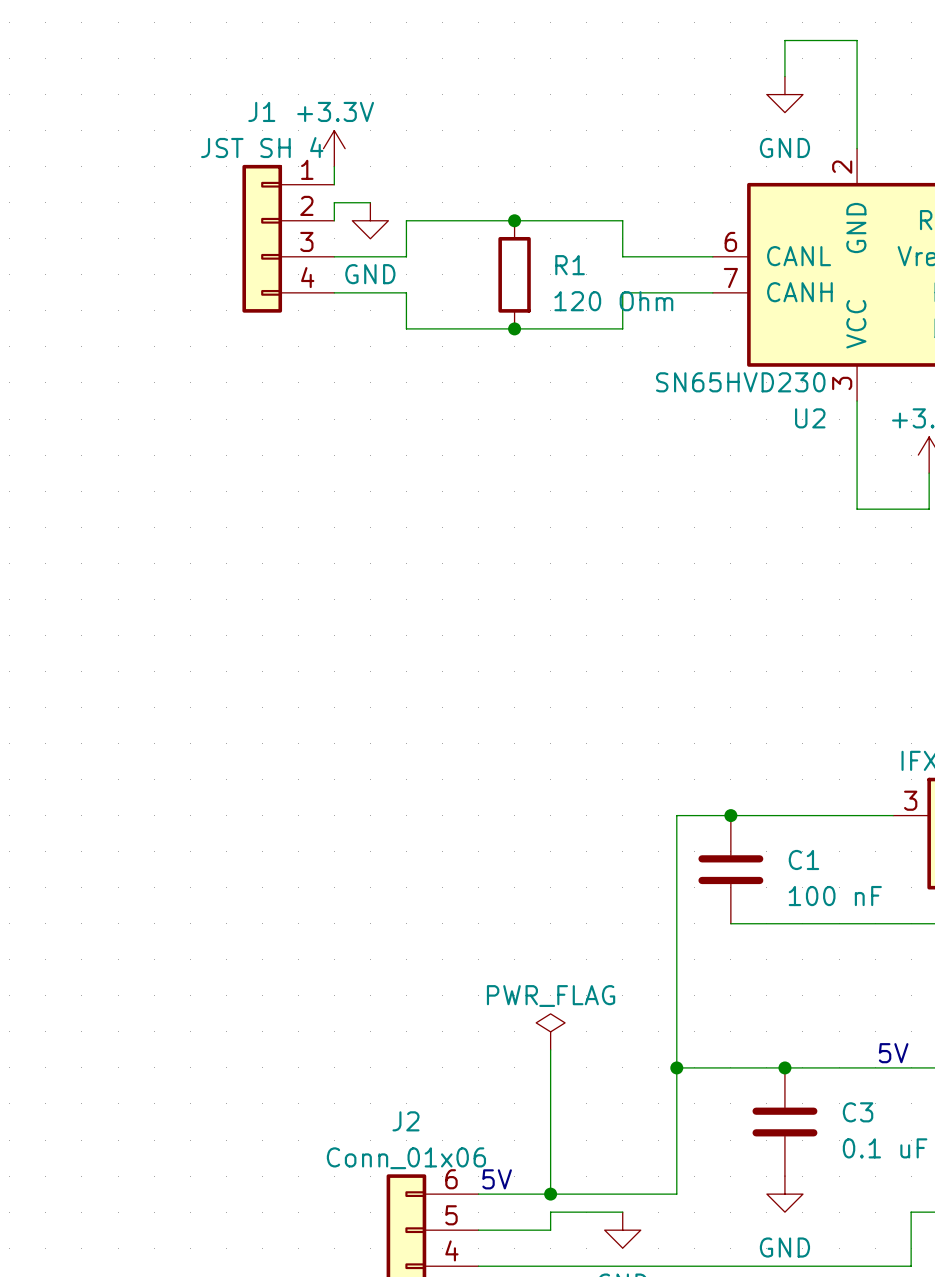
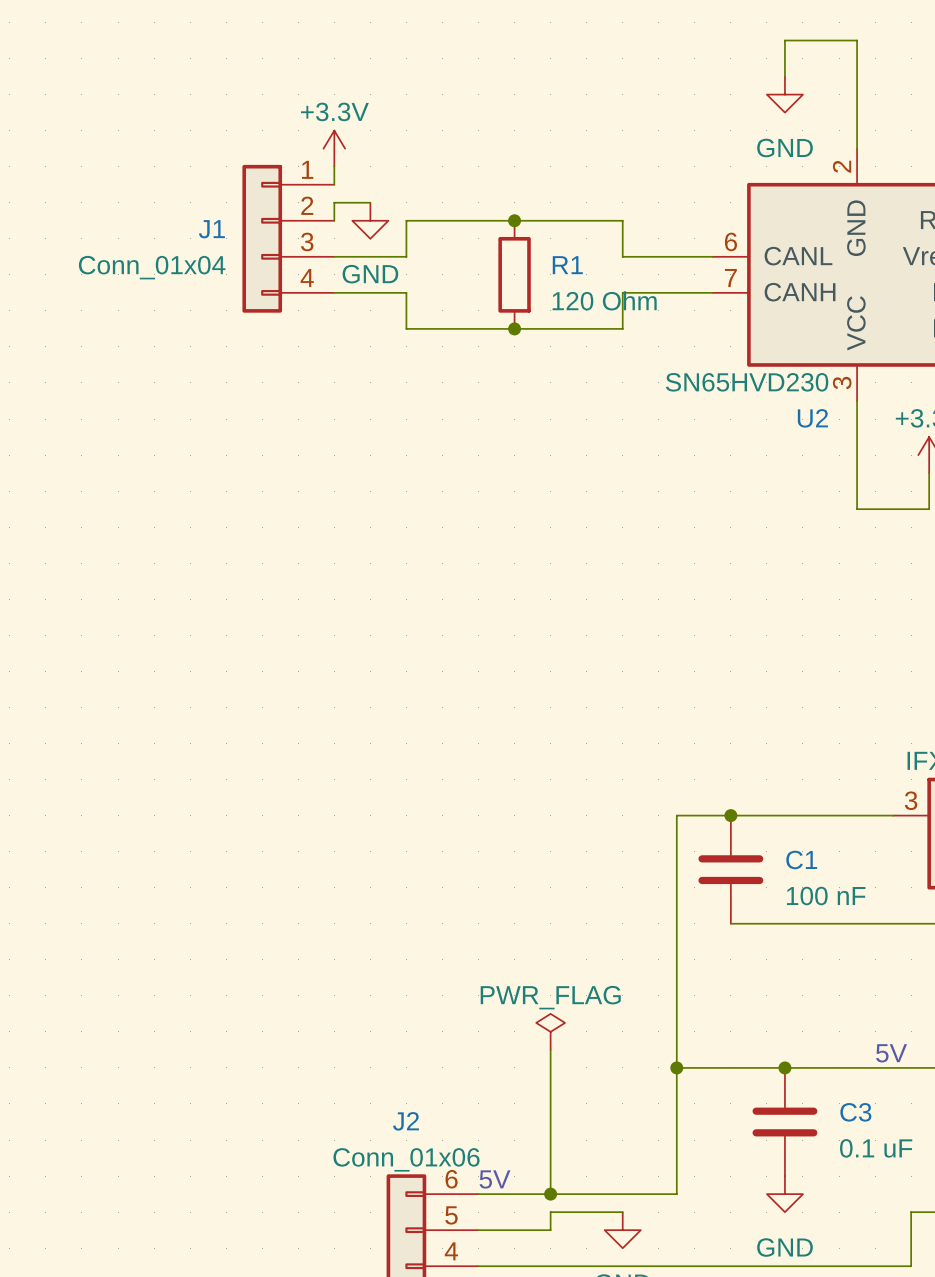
J1 name position: J1 (261, 111) -> J1 (211, 229)
J1 value: JST SH 4 (262, 147) -> Conn_01x04 (152, 267)

